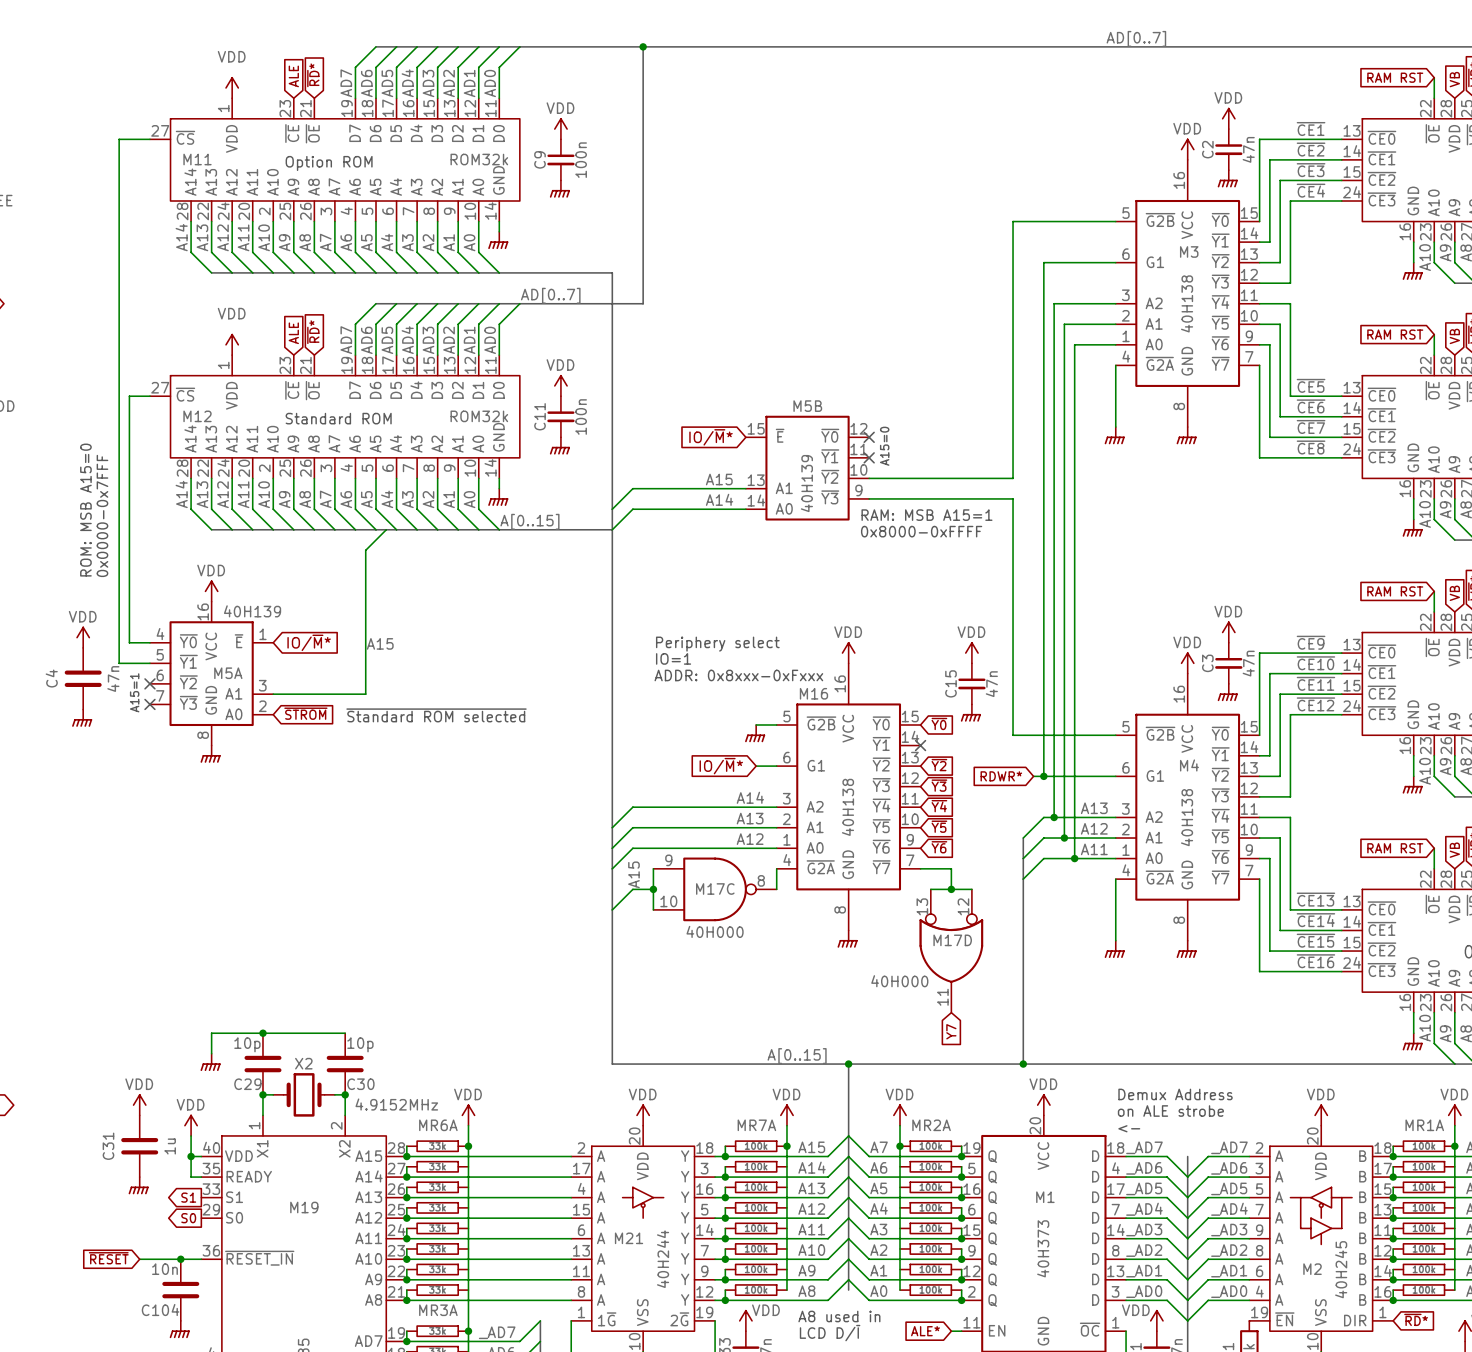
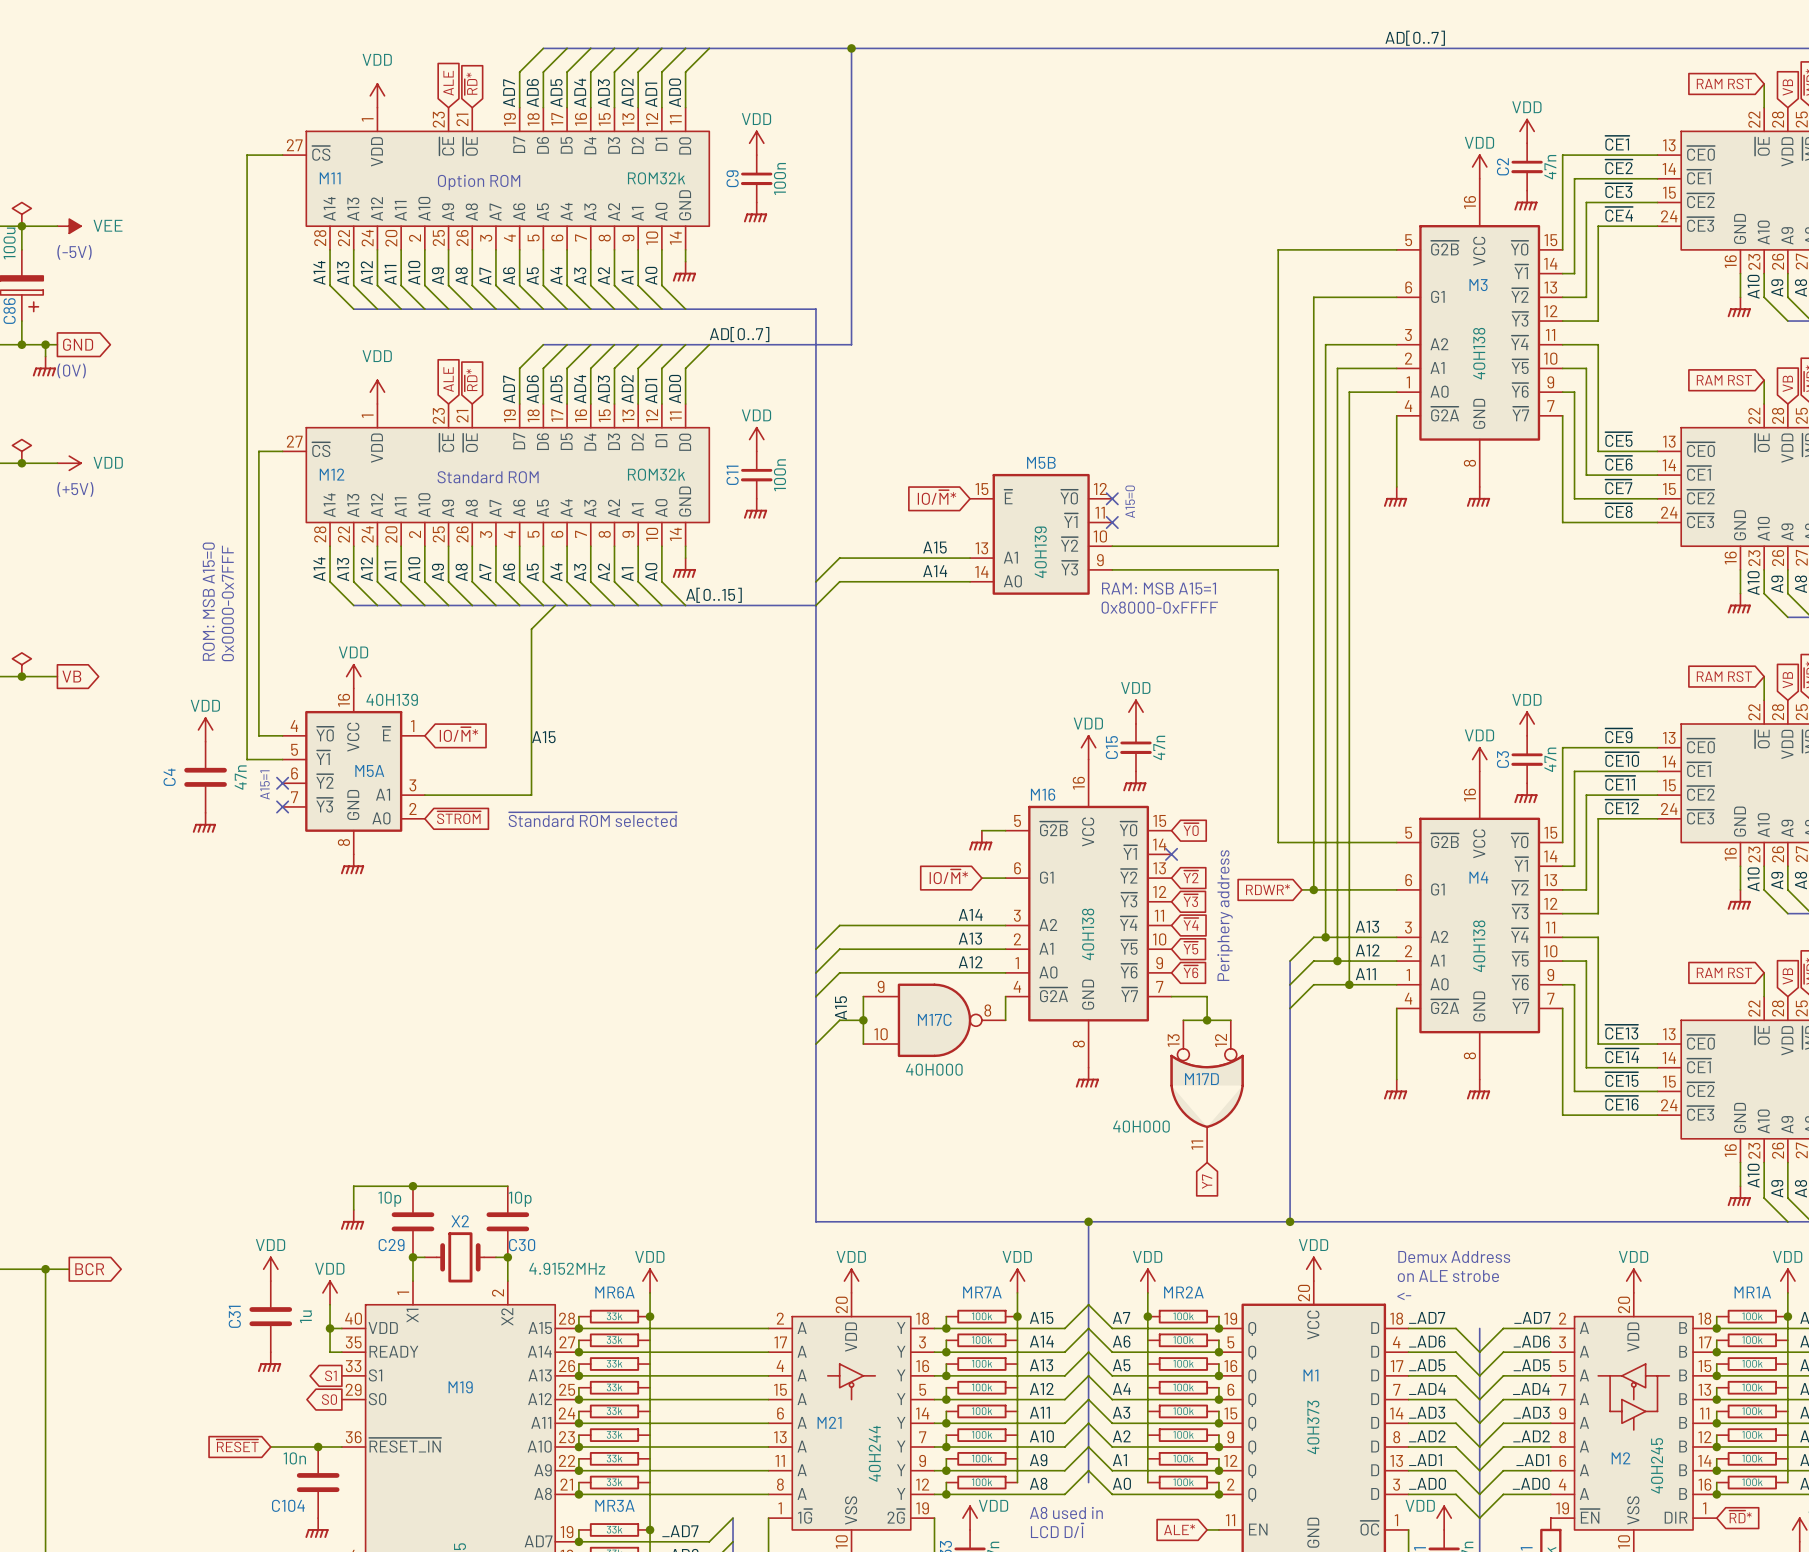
text: Periphery select (717, 644) -> none
power symbol position: VDD (971, 653) -> VDD (1135, 712)
text: IO=1 (673, 658) -> none
text: ADDR: 0x8xxx-0xFxxx (738, 675) -> none
C15 position: (971, 683) -> (1135, 747)
power symbol position: (970, 713) -> (1134, 781)
text: none -> Periphery address (1225, 915)
label: A[0..15] (797, 1056) -> none

